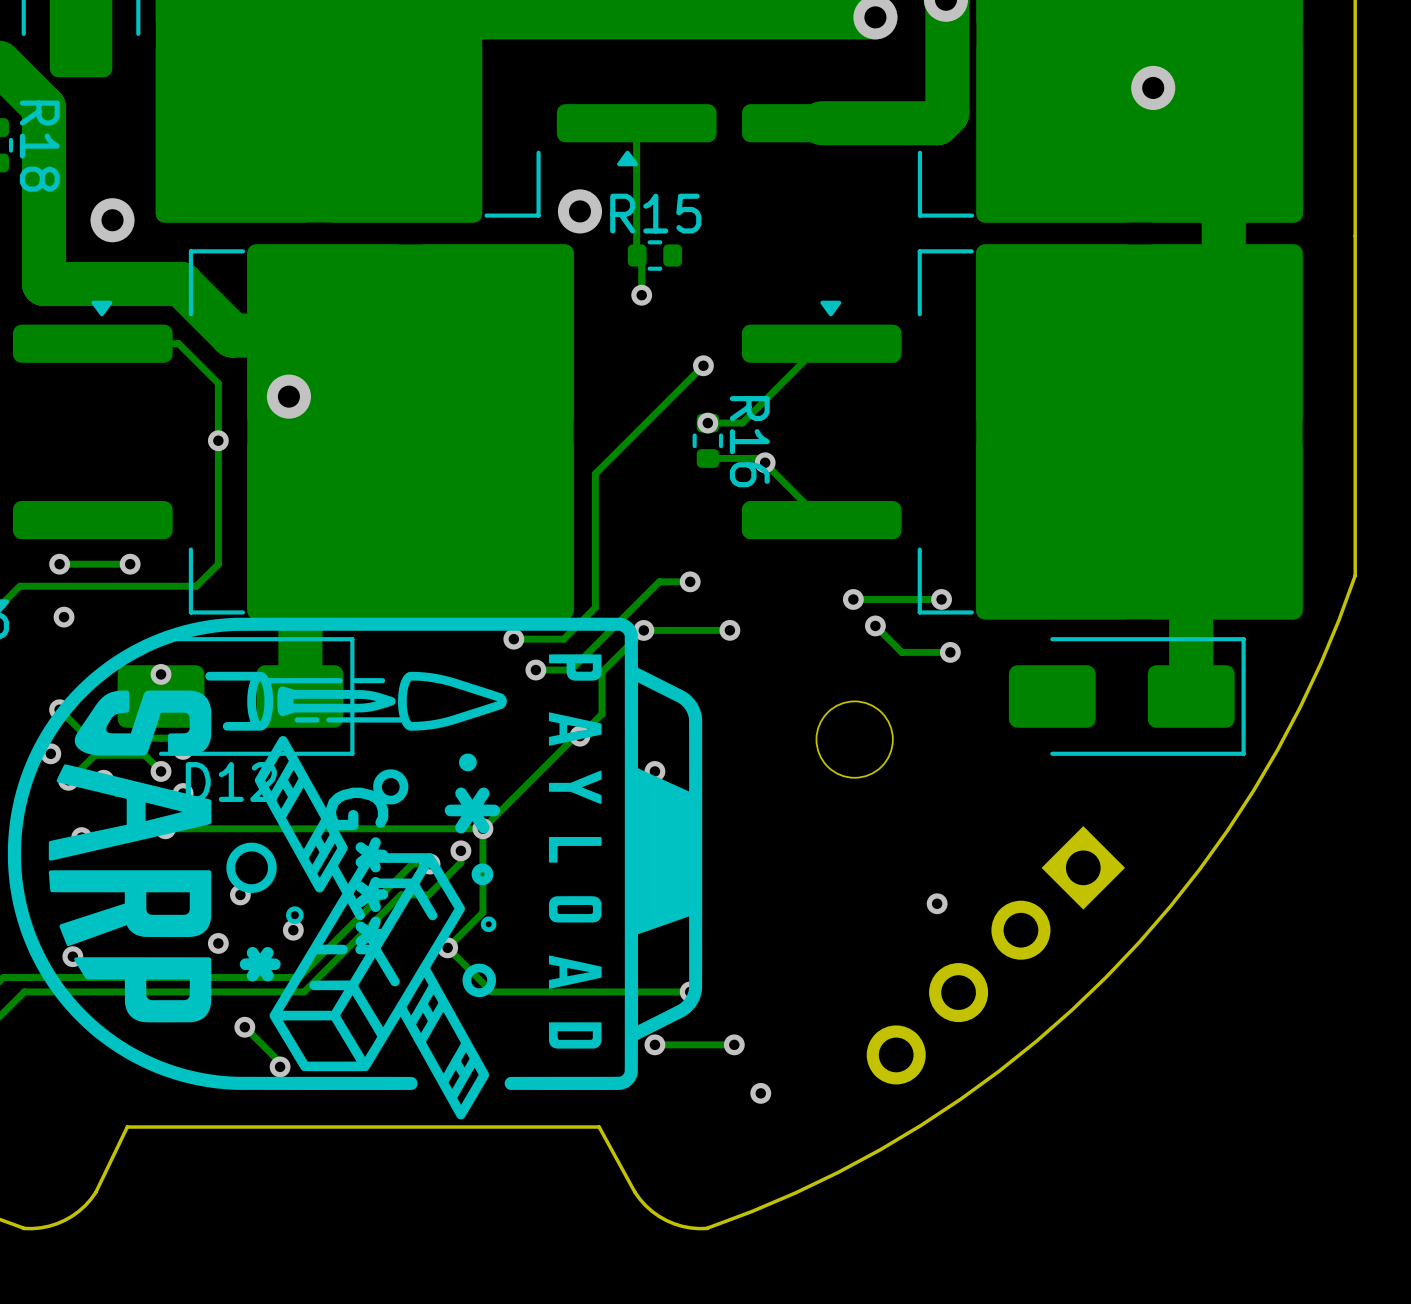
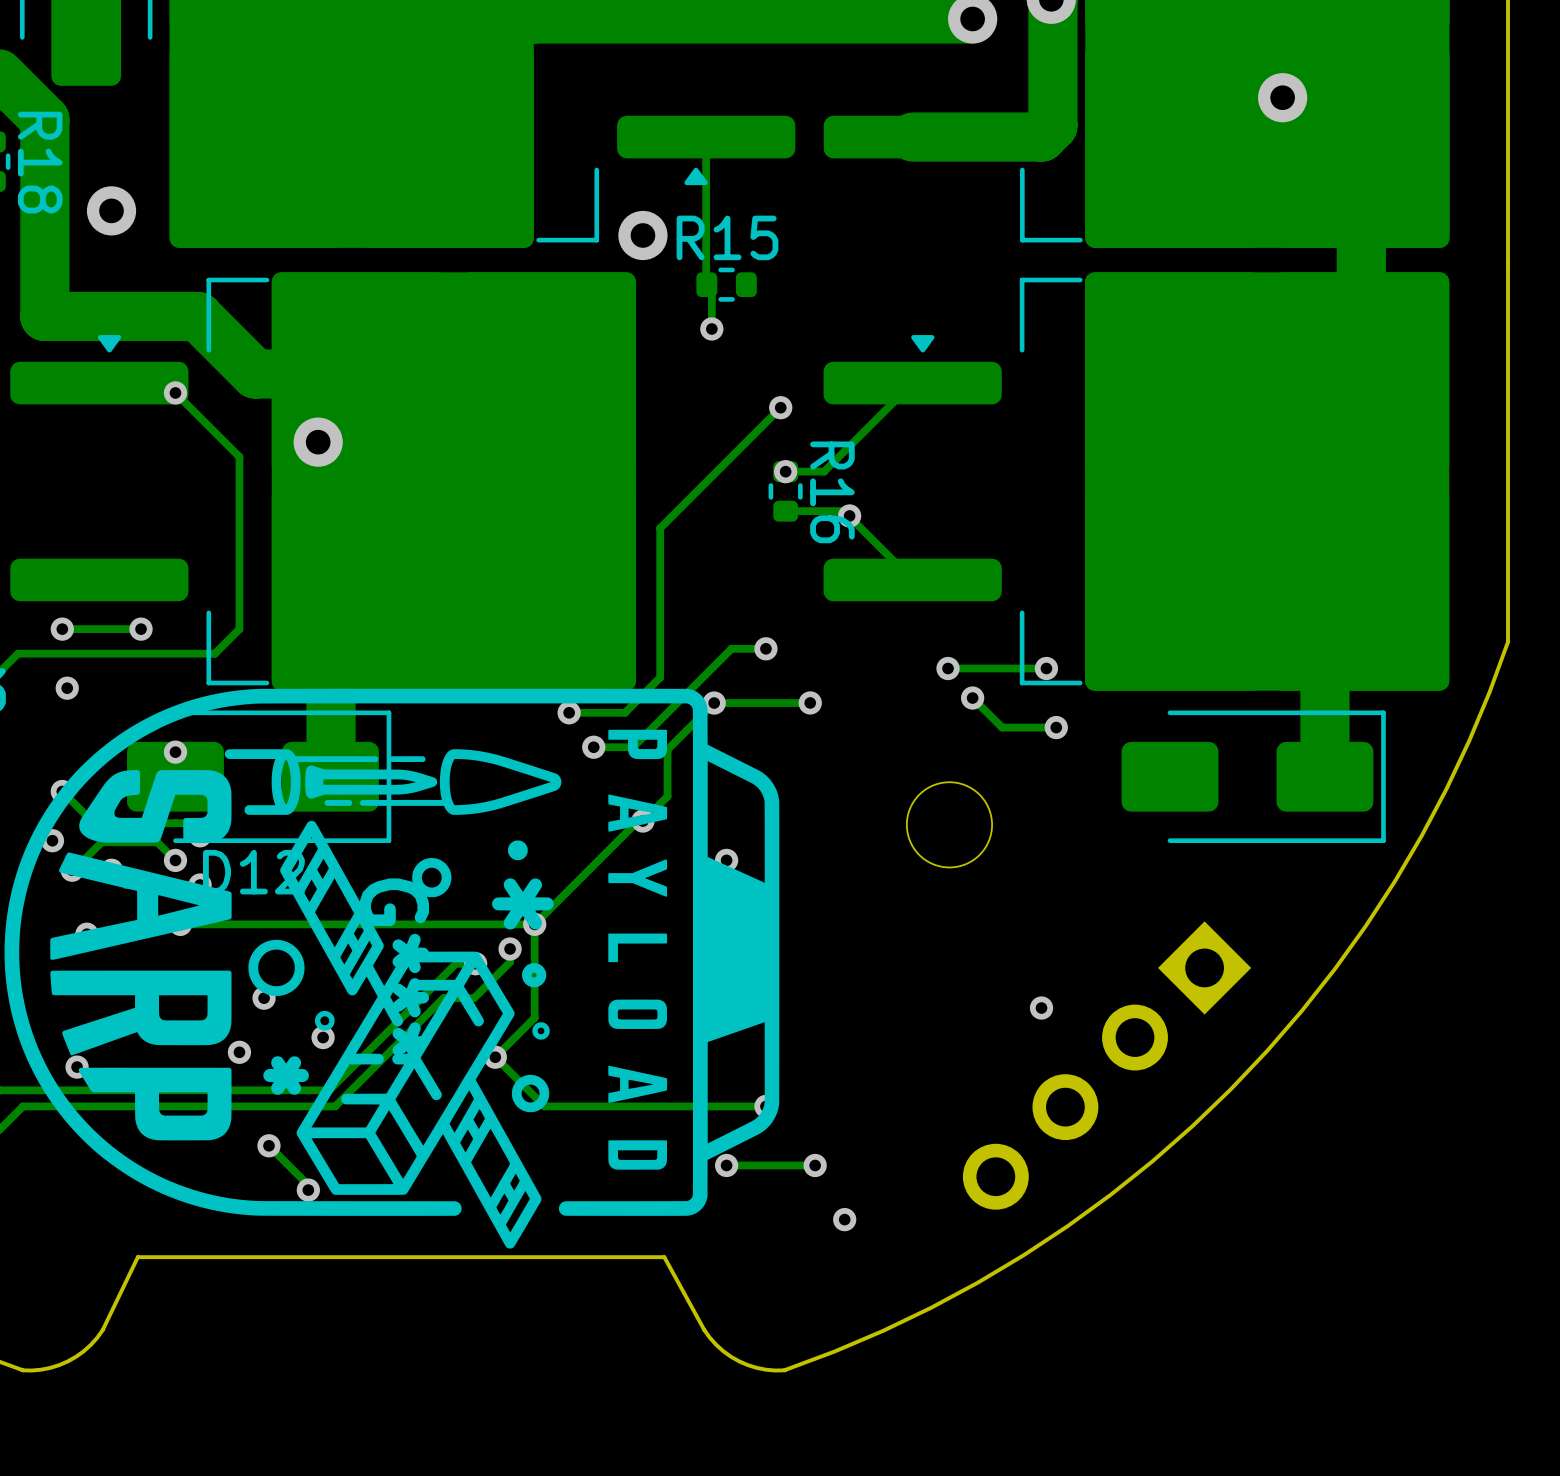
via position: (112, 220) -> (111, 210)
track: (92, 343) (178, 343) (218, 383) (218, 409) -> (175, 392) (239, 456)
via position: (218, 440) -> (175, 392)

